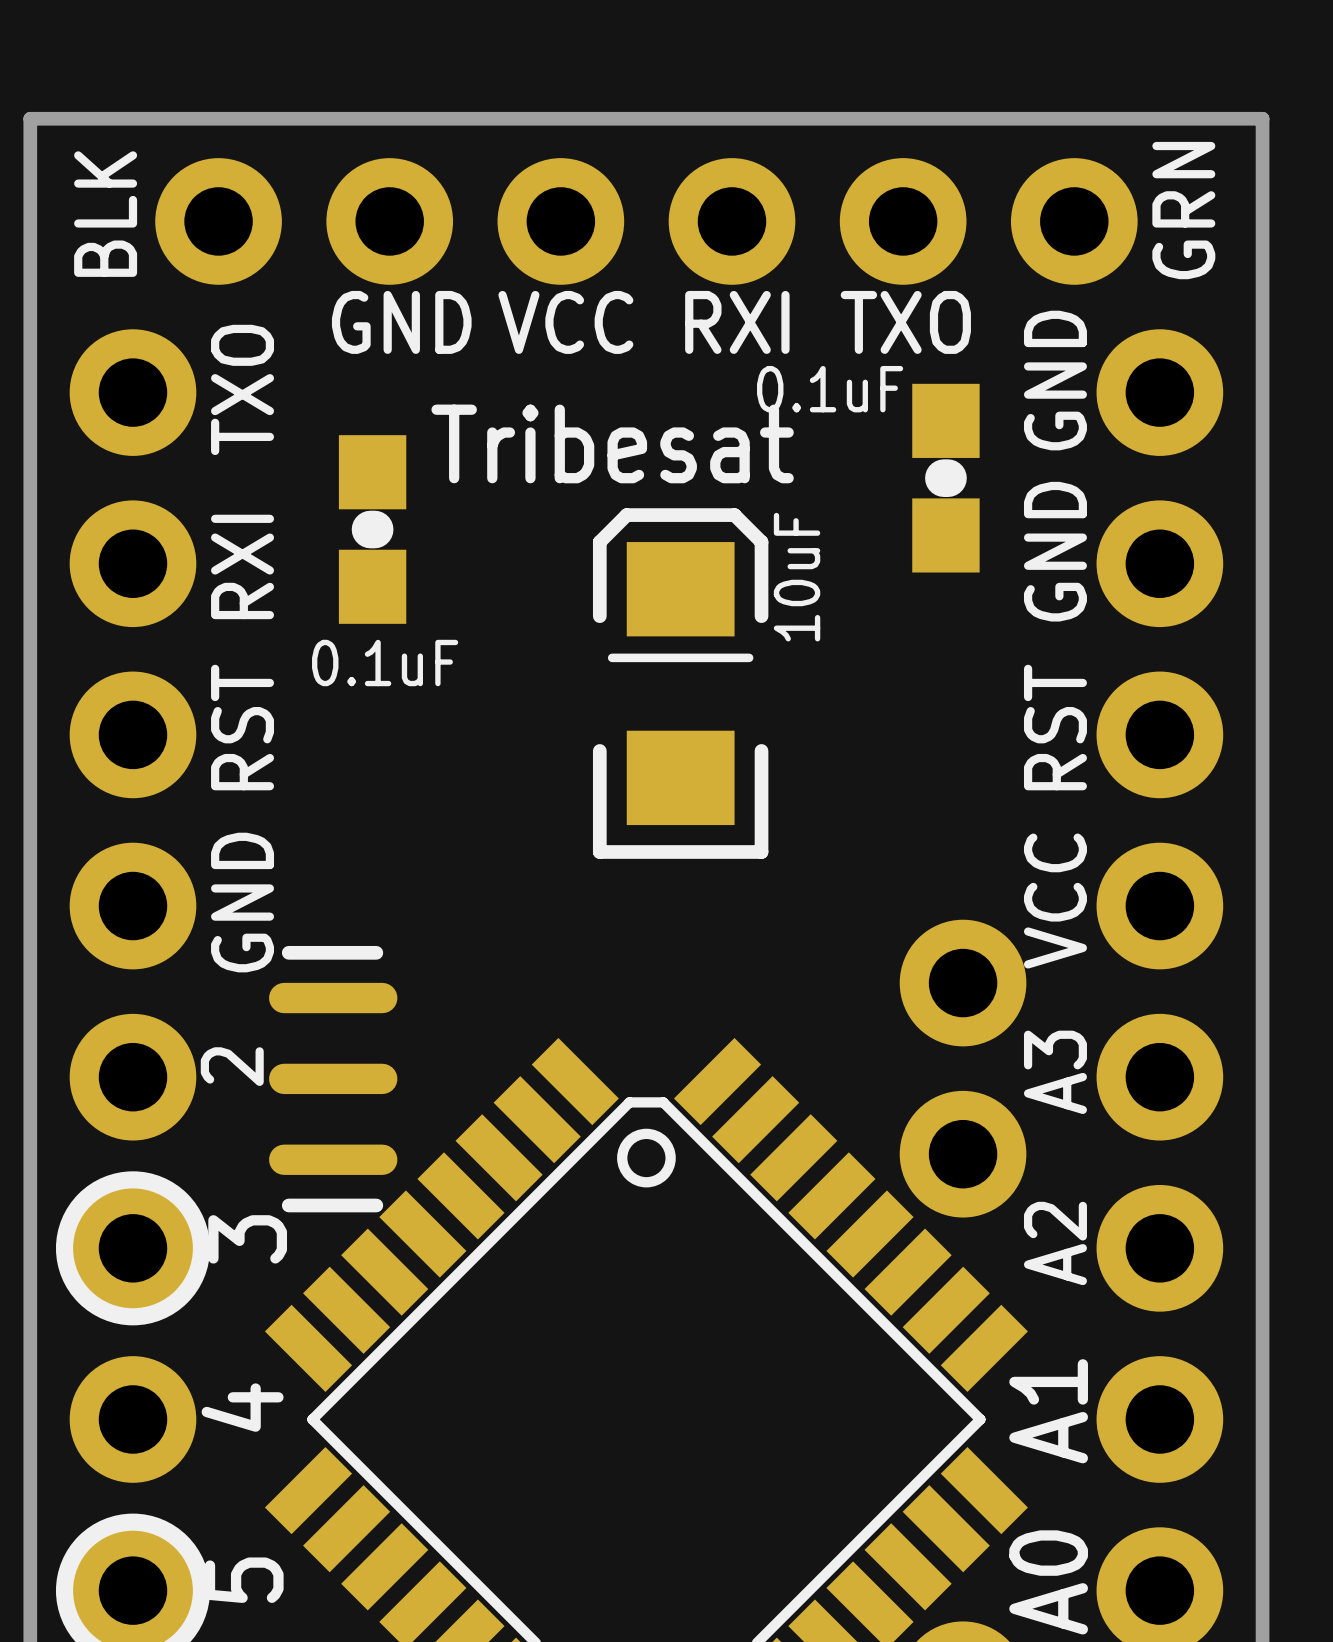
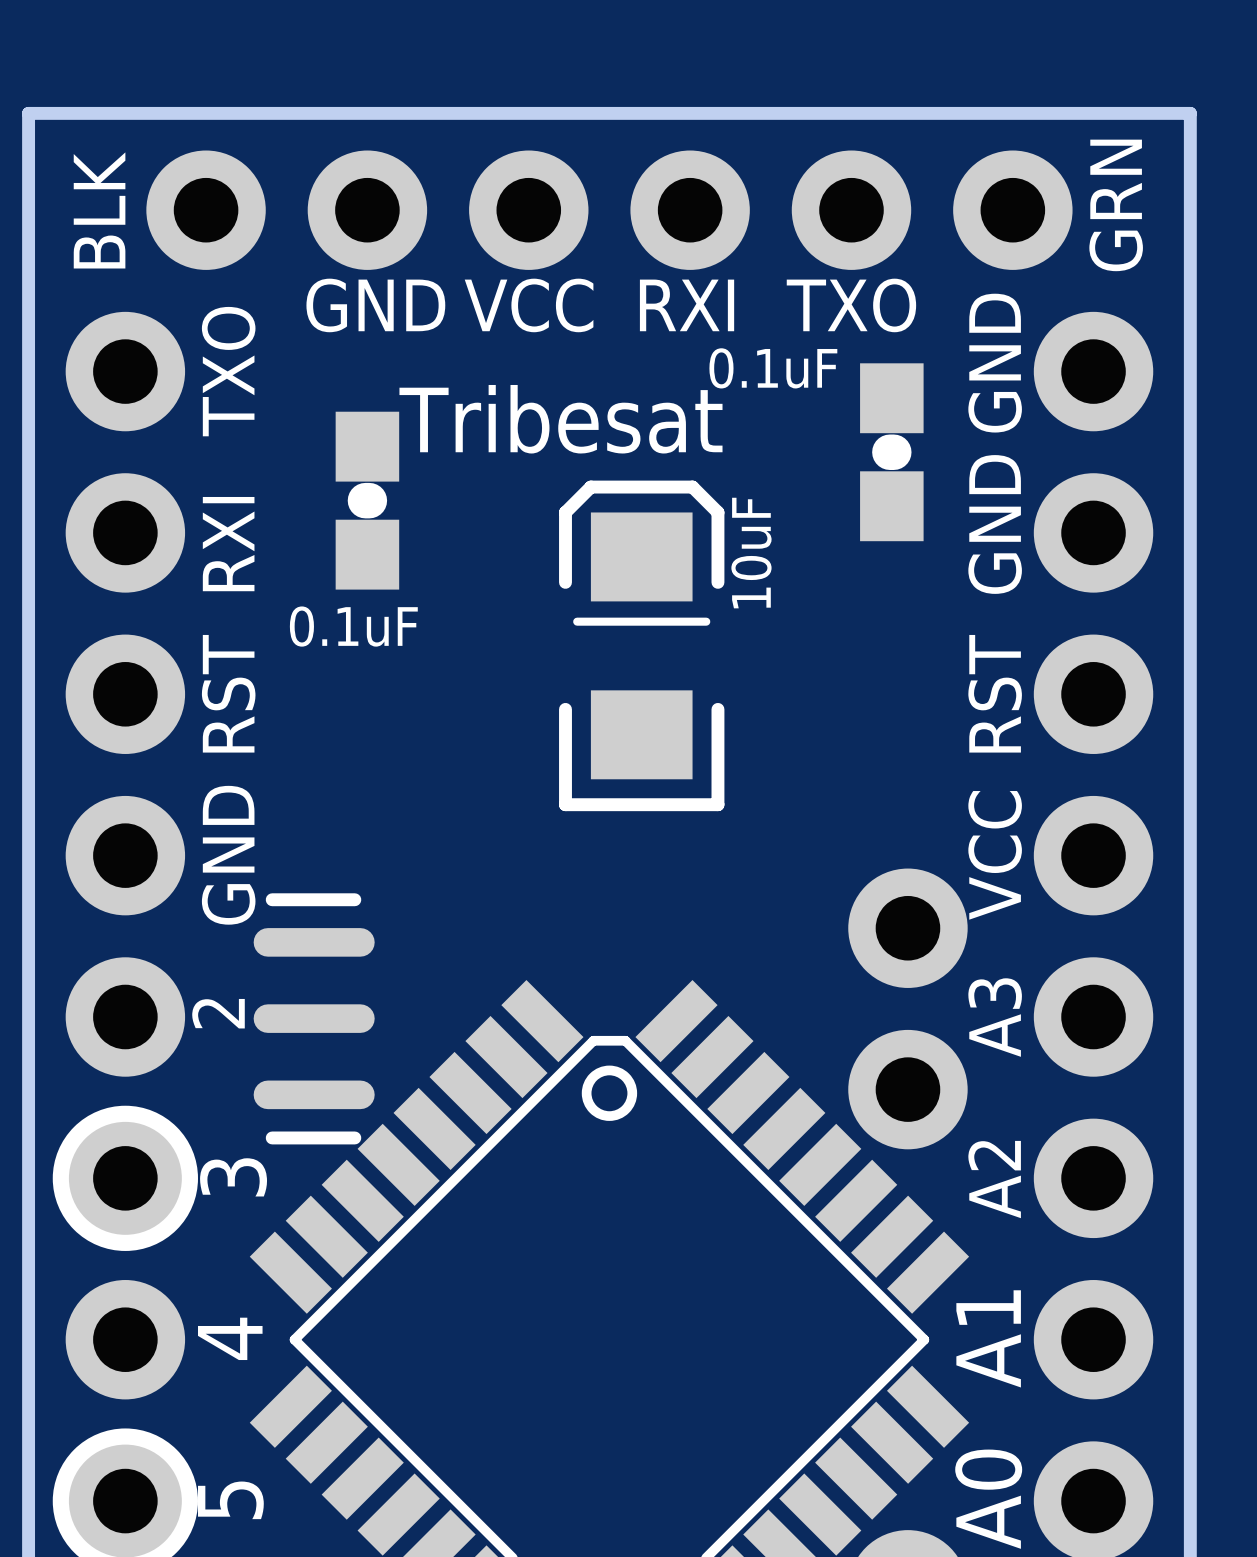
part position: (372, 529) -> (367, 500)

